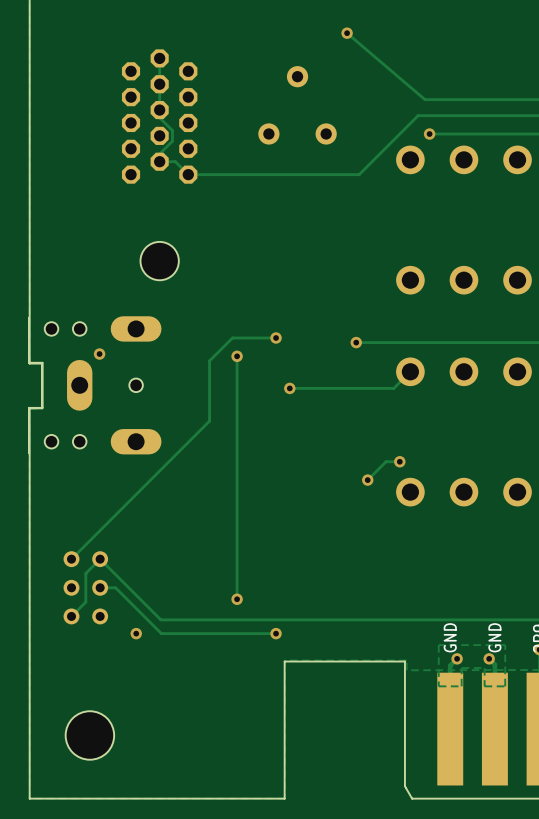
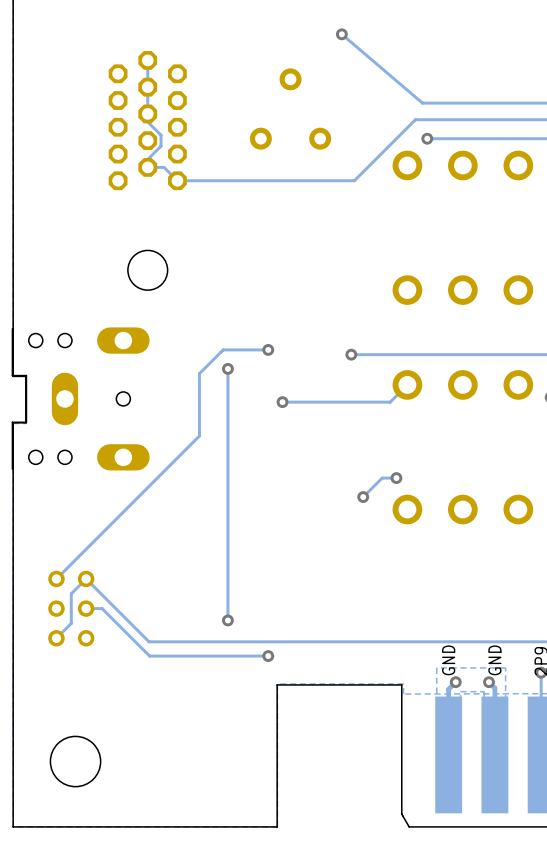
via: (99, 354) -> none
via: (136, 633) -> none

